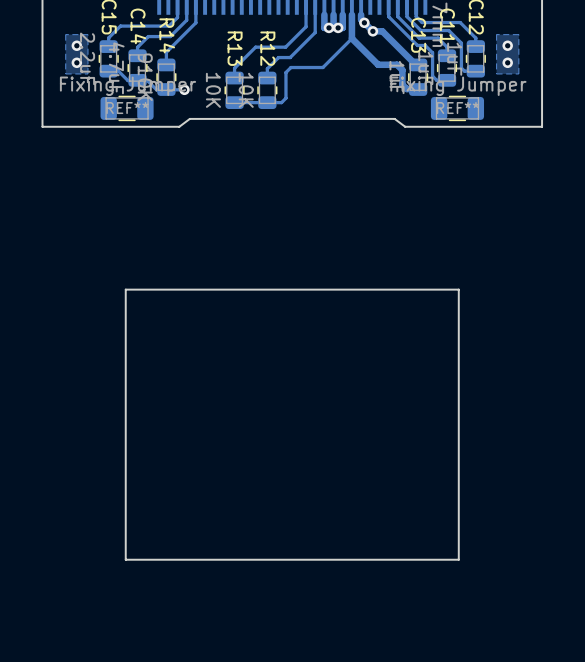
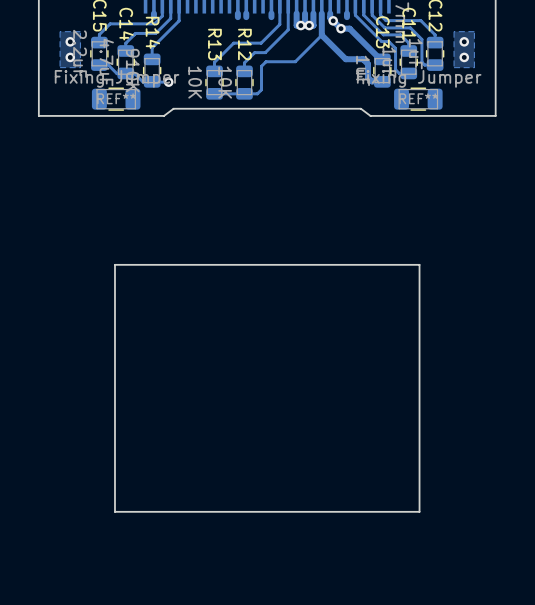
track: none -> (153, 13) (153, 17)
track: none -> (237, 13) (237, 17)
track: none -> (246, 13) (246, 17)
track: none -> (271, 13) (271, 17)
track: none -> (346, 13) (346, 17)

